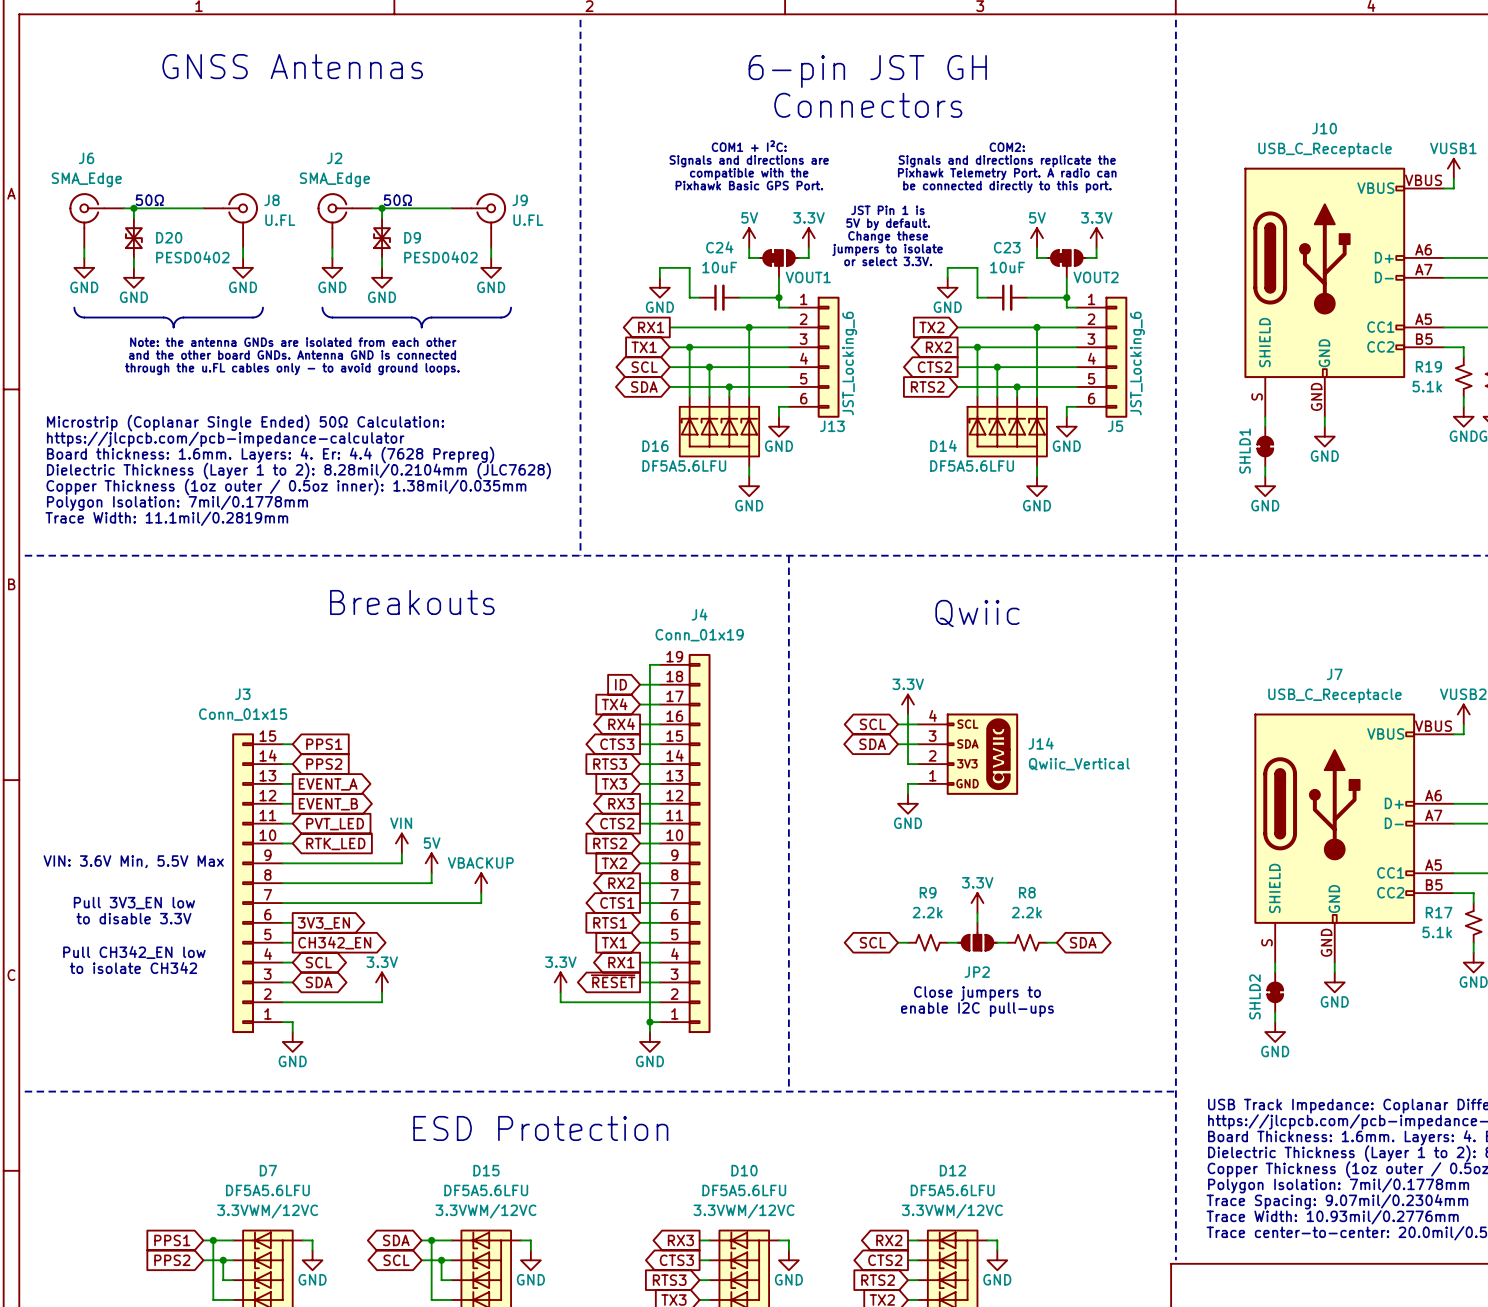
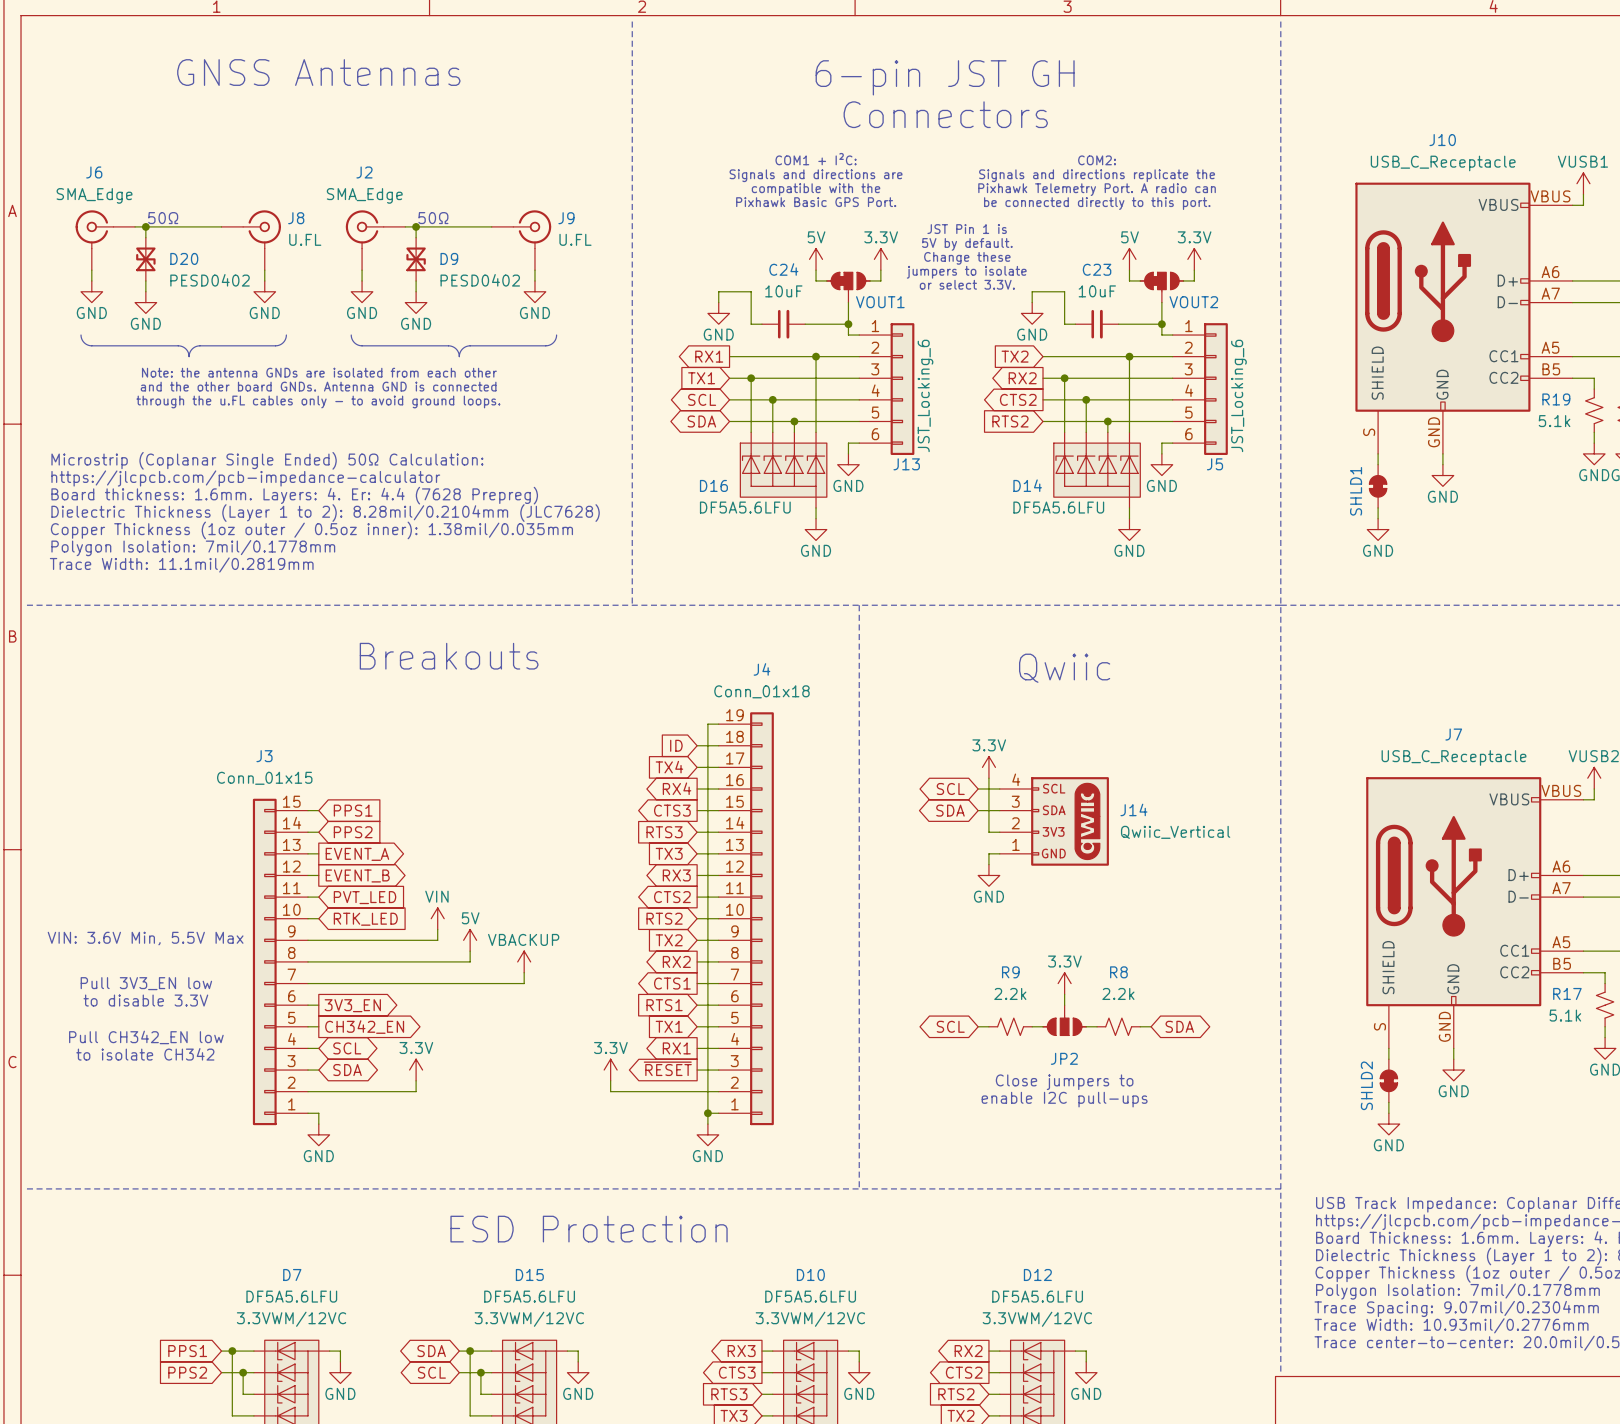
J4 value: Conn_01x19 (699, 635) -> Conn_01x18 (761, 691)

